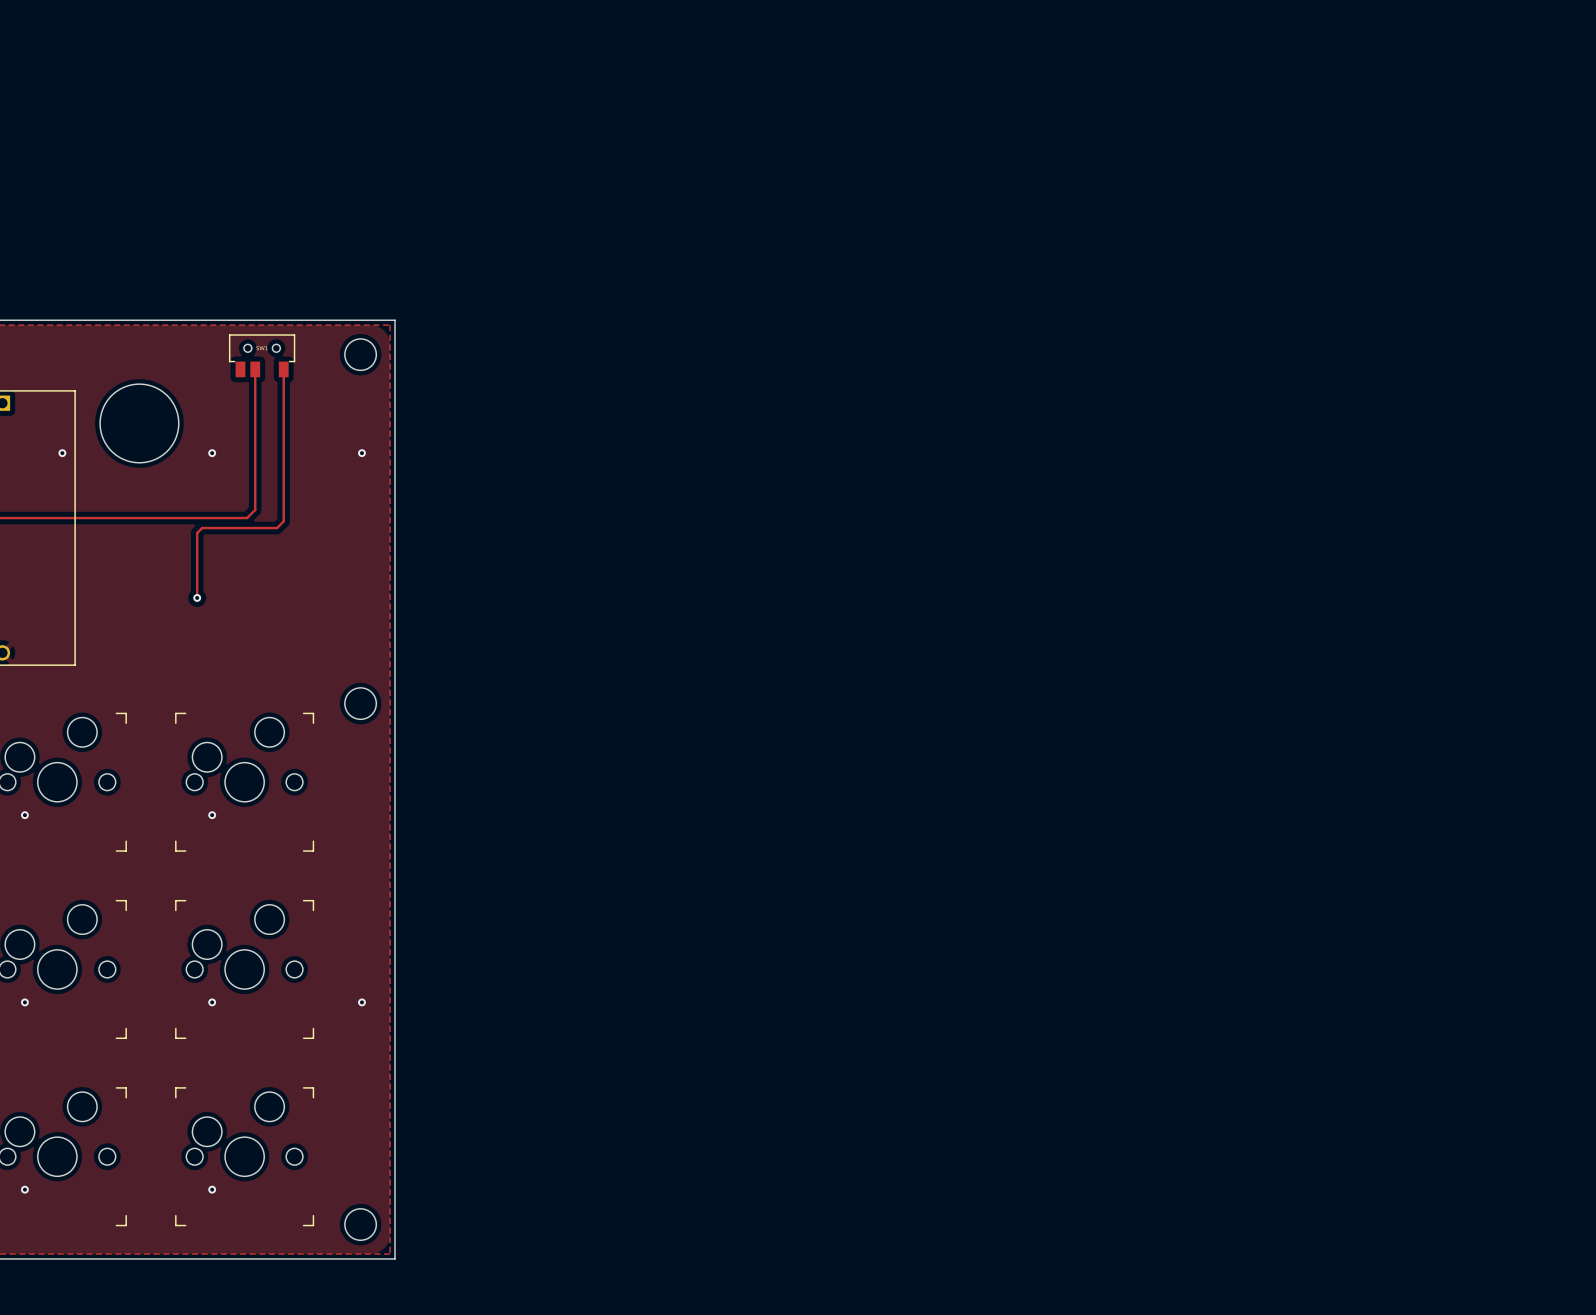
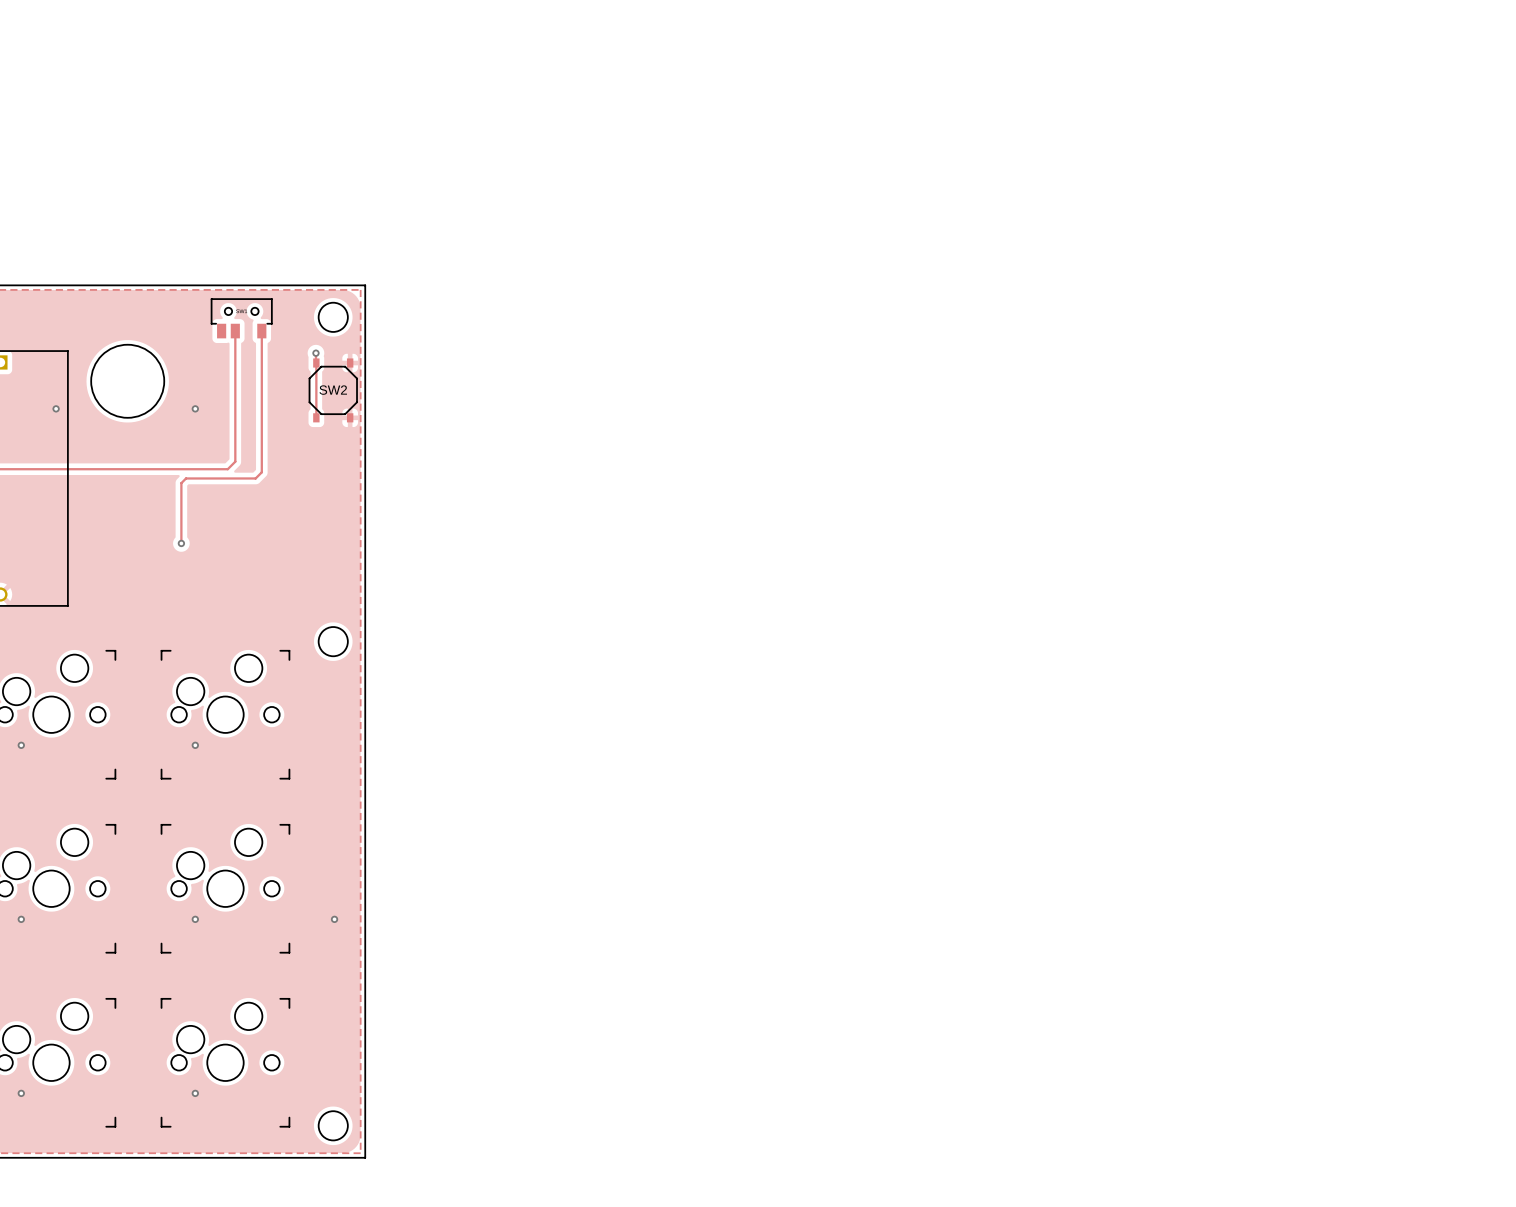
track: none -> (315, 353) (316, 417)
via: none -> (315, 353)
SW2: none -> (333, 390)
via: (361, 453) -> none

